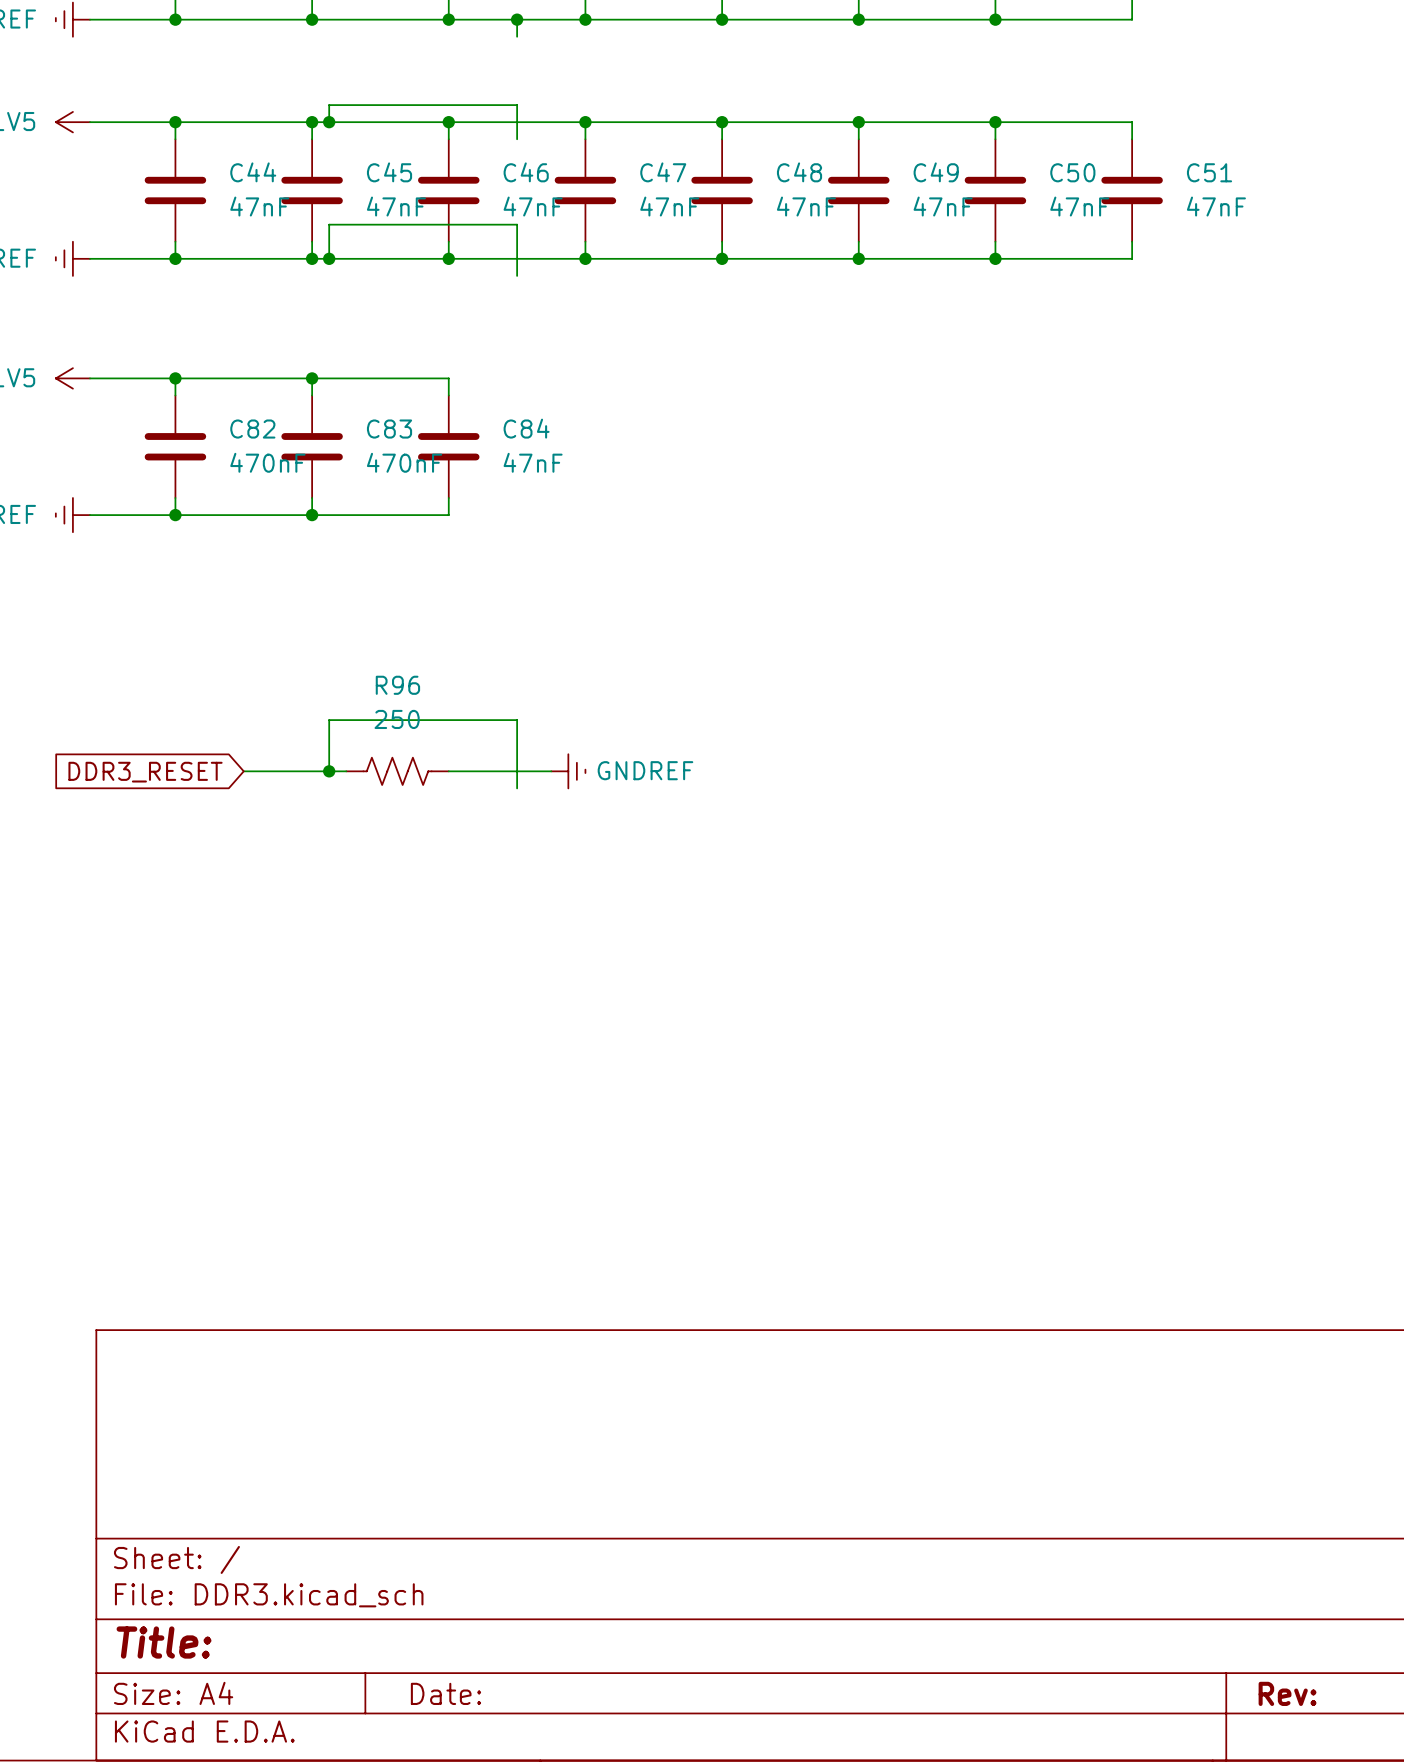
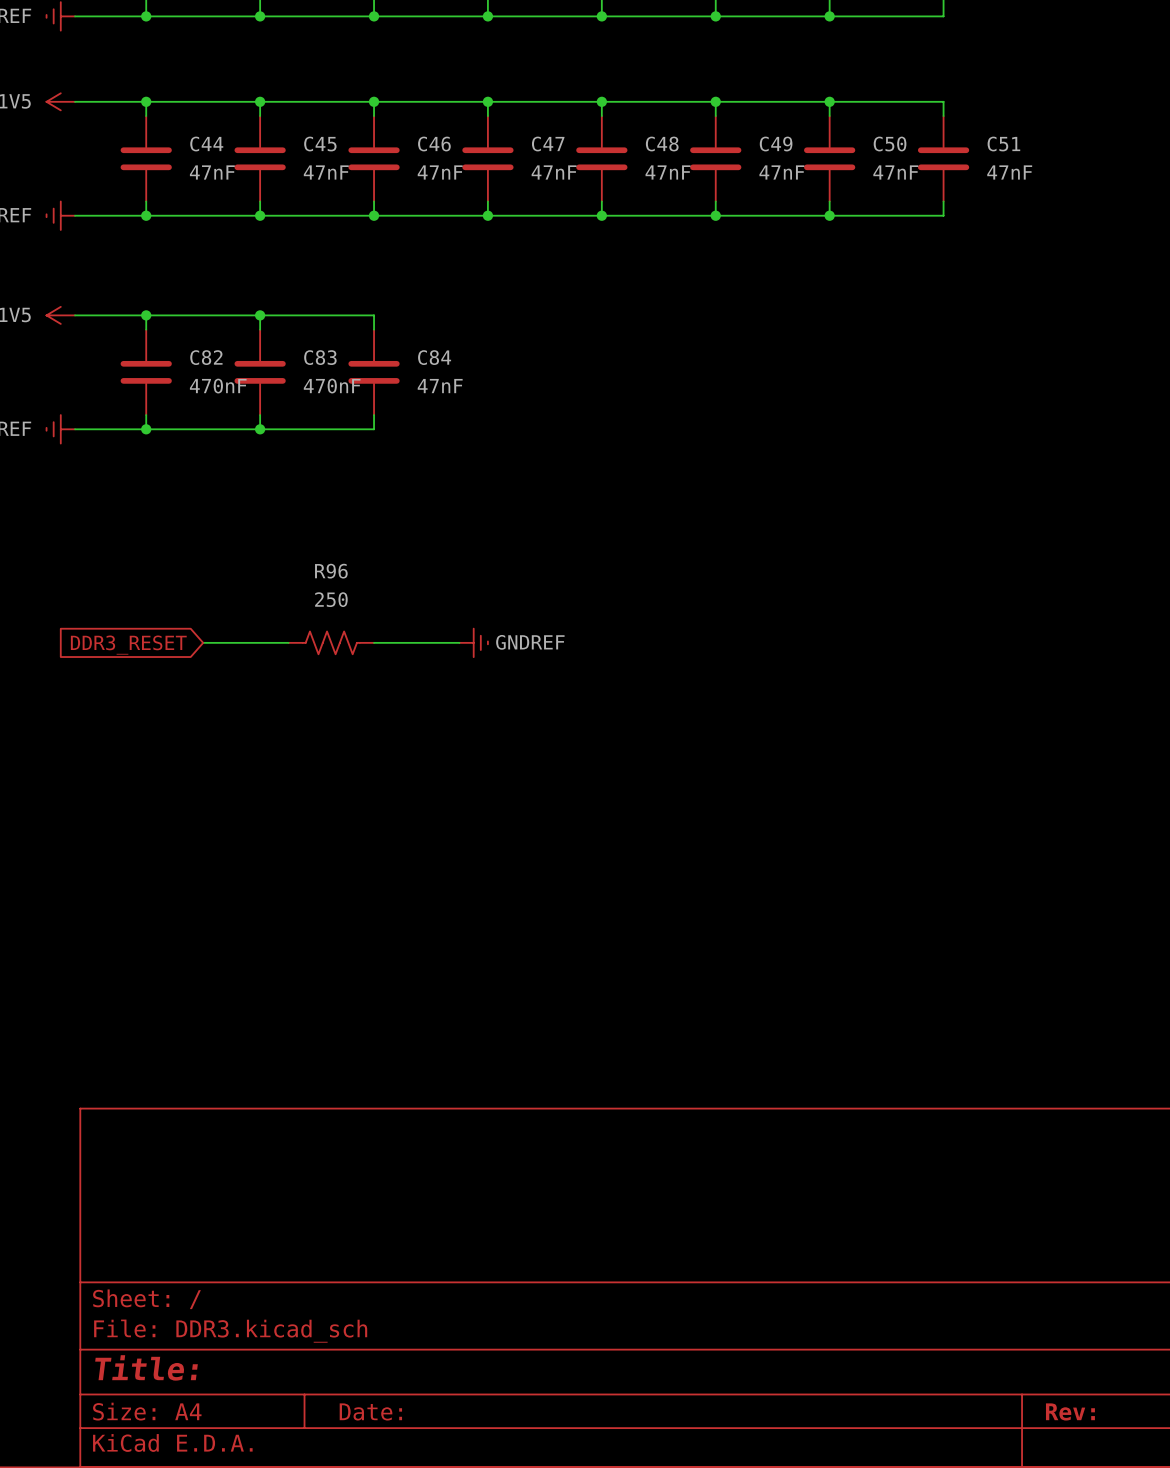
wire: (517, 19) (517, 36) -> none
junction: (517, 19) -> none
wire: (329, 122) (329, 105) (517, 105) (517, 139) -> none
junction: (329, 122) -> none
wire: (329, 258) (329, 224) (517, 224) (517, 275) -> none
junction: (329, 258) -> none
wire: (329, 771) (329, 720) (517, 720) (517, 788) -> none
junction: (329, 771) -> none

